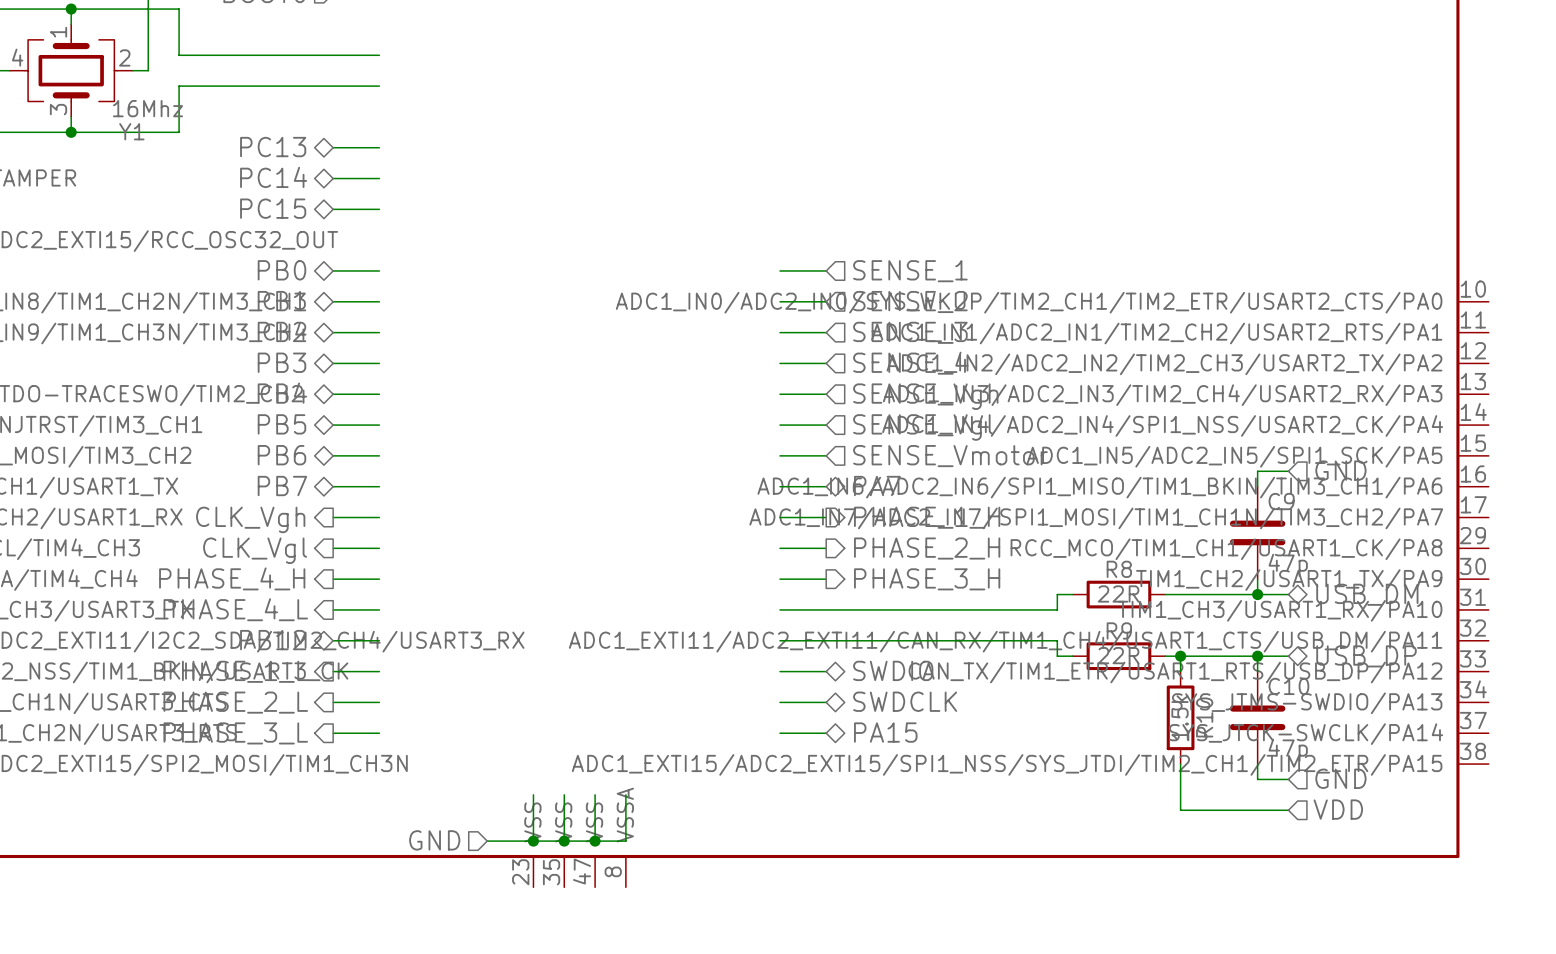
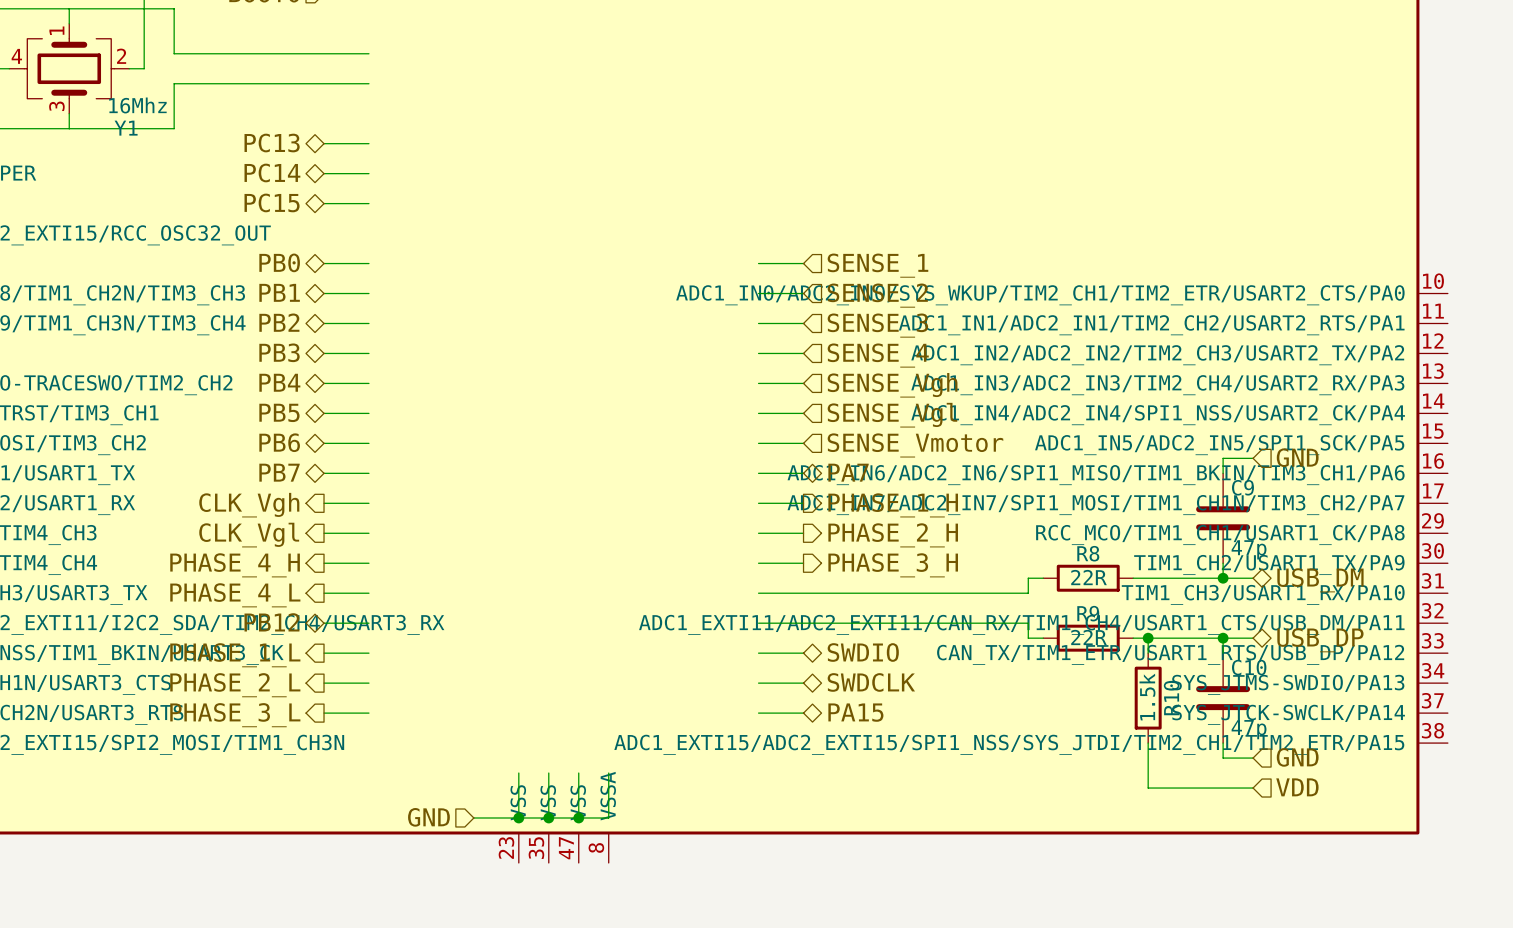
junction: (71, 9) -> none
junction: (71, 132) -> none

